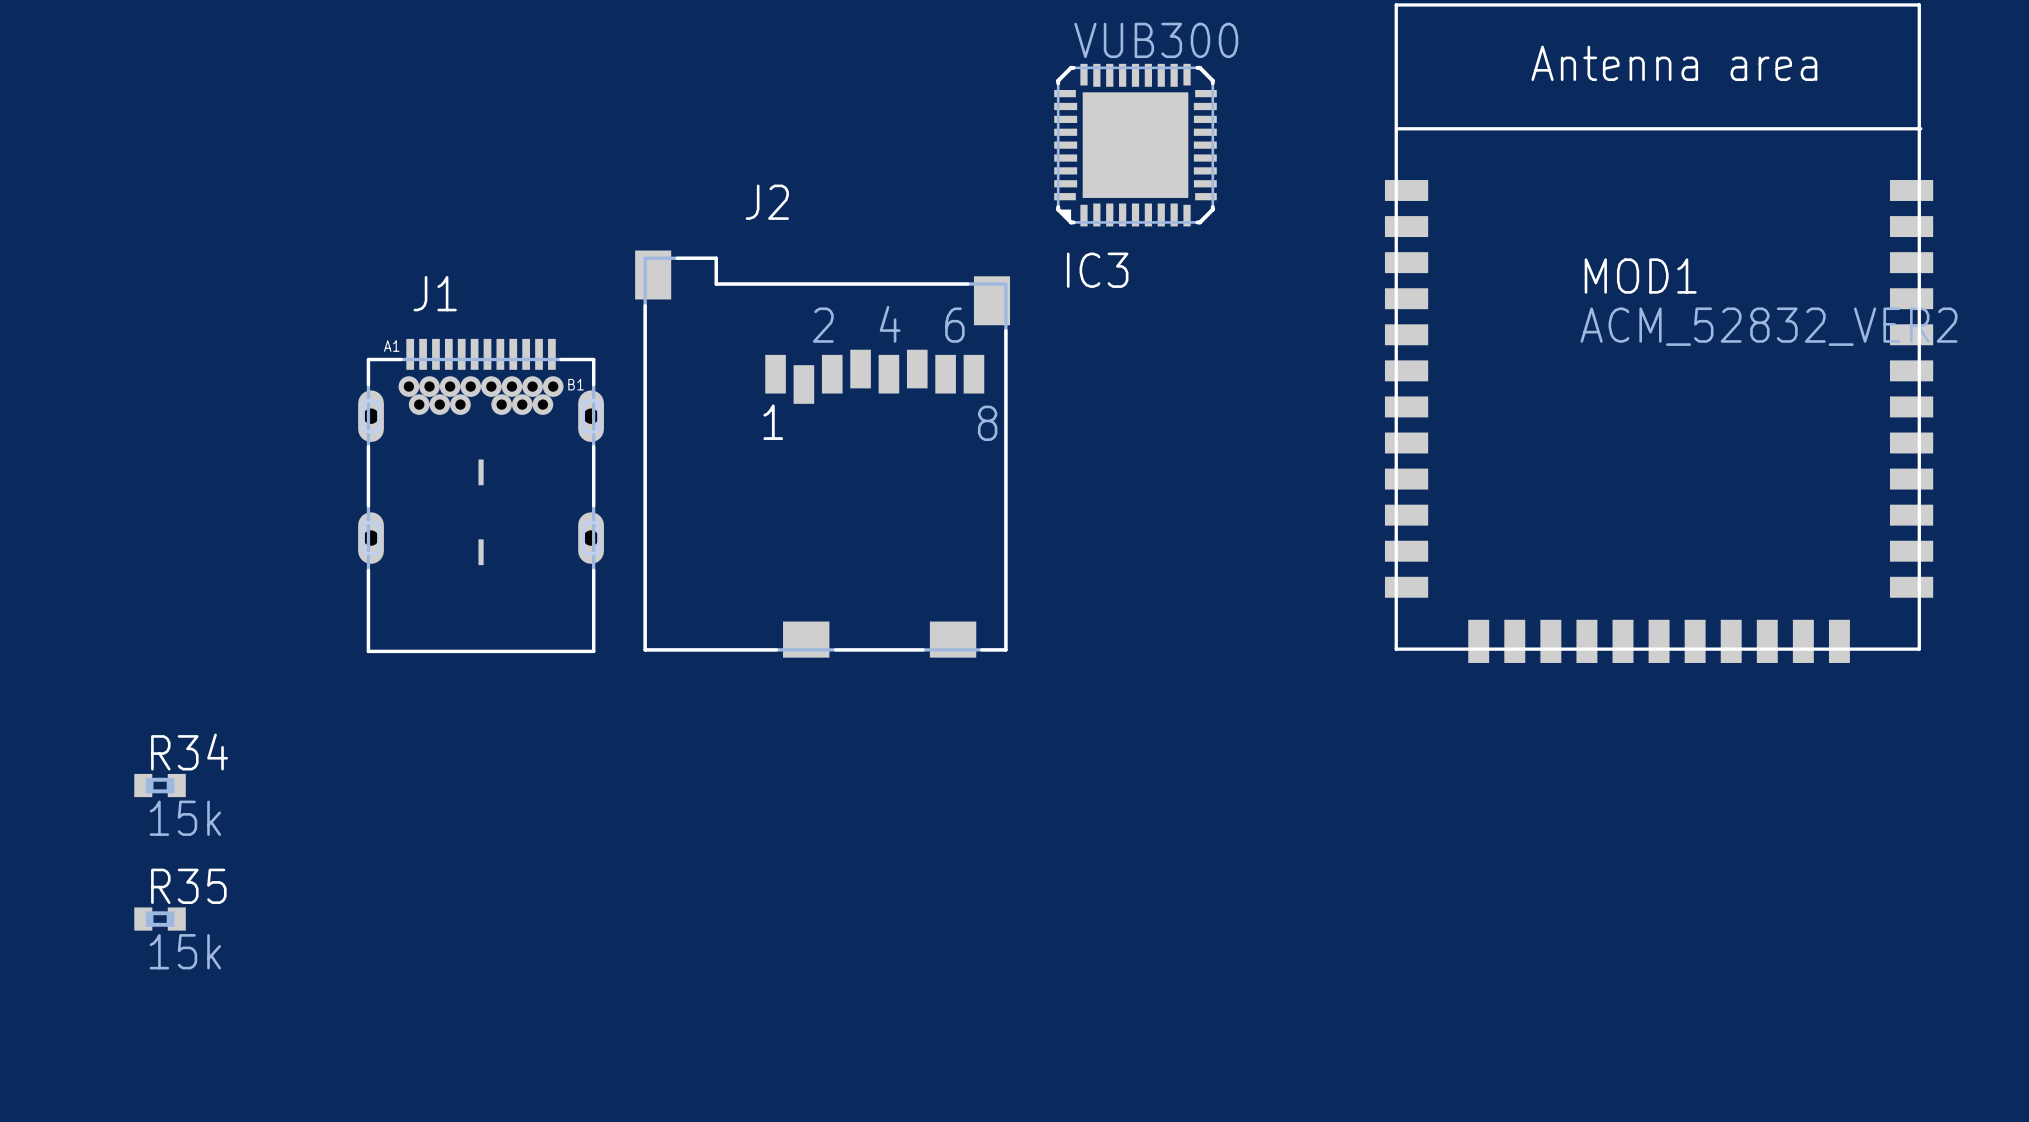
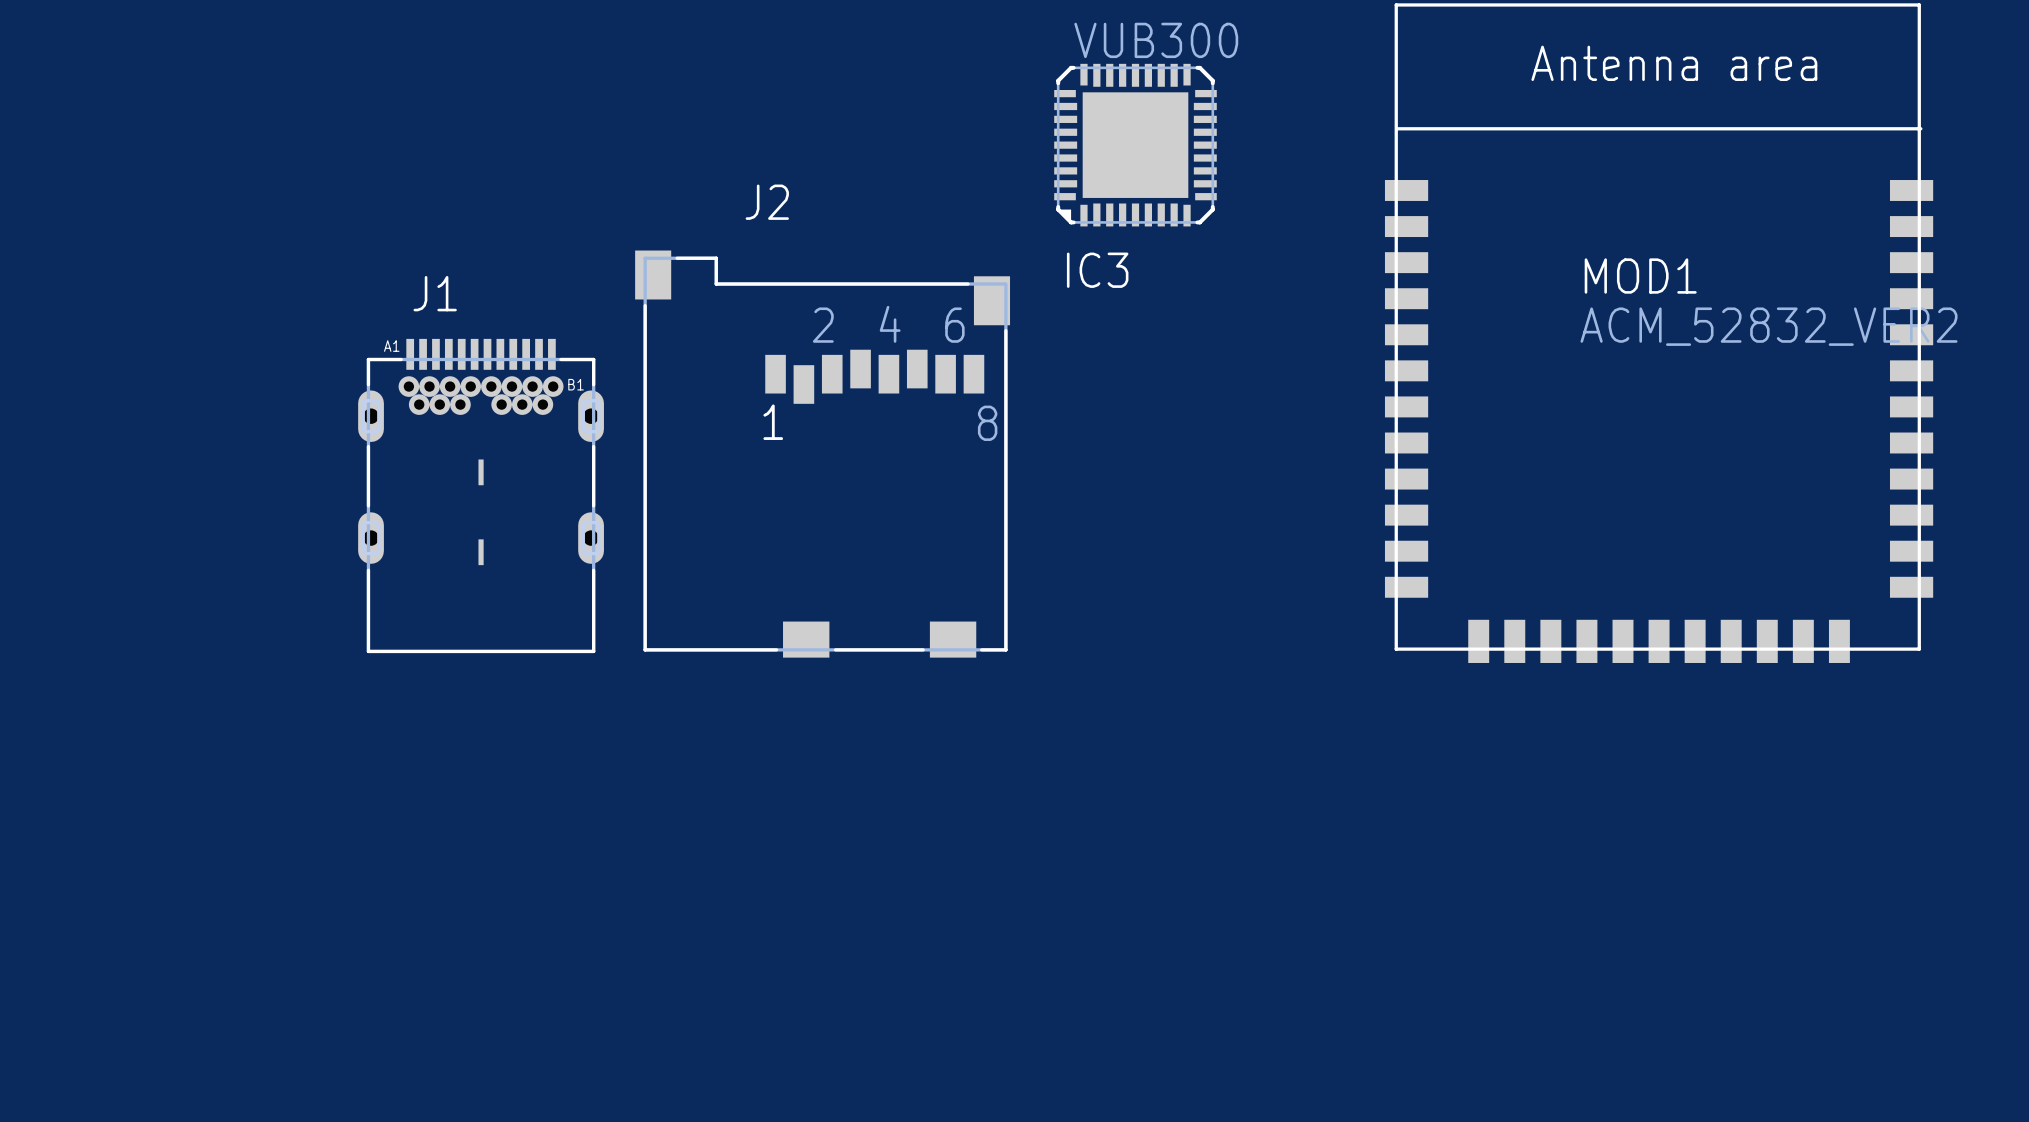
R34: 15k (160, 785) -> none
R35: 15k (160, 919) -> none

